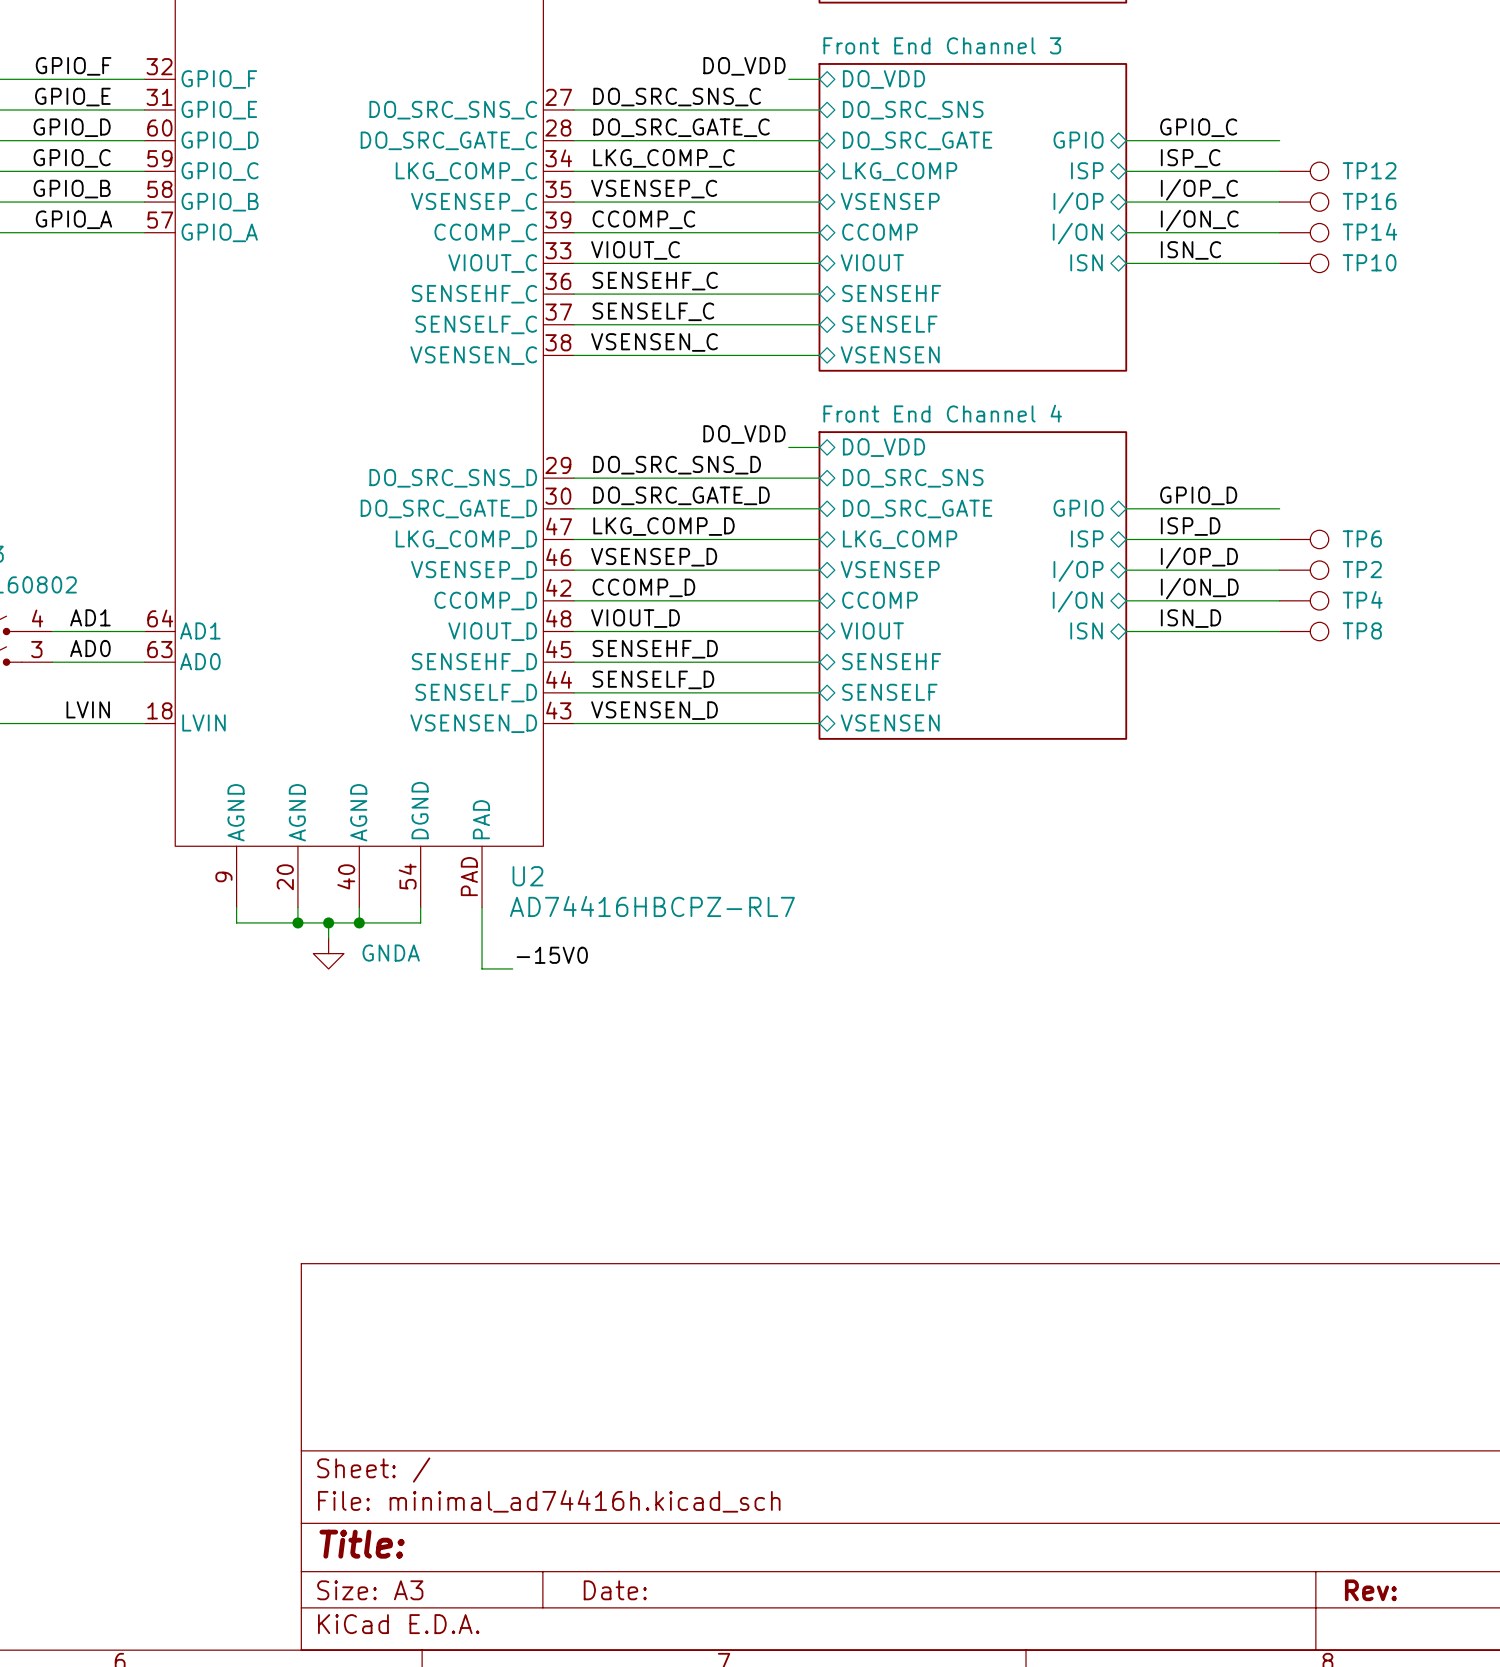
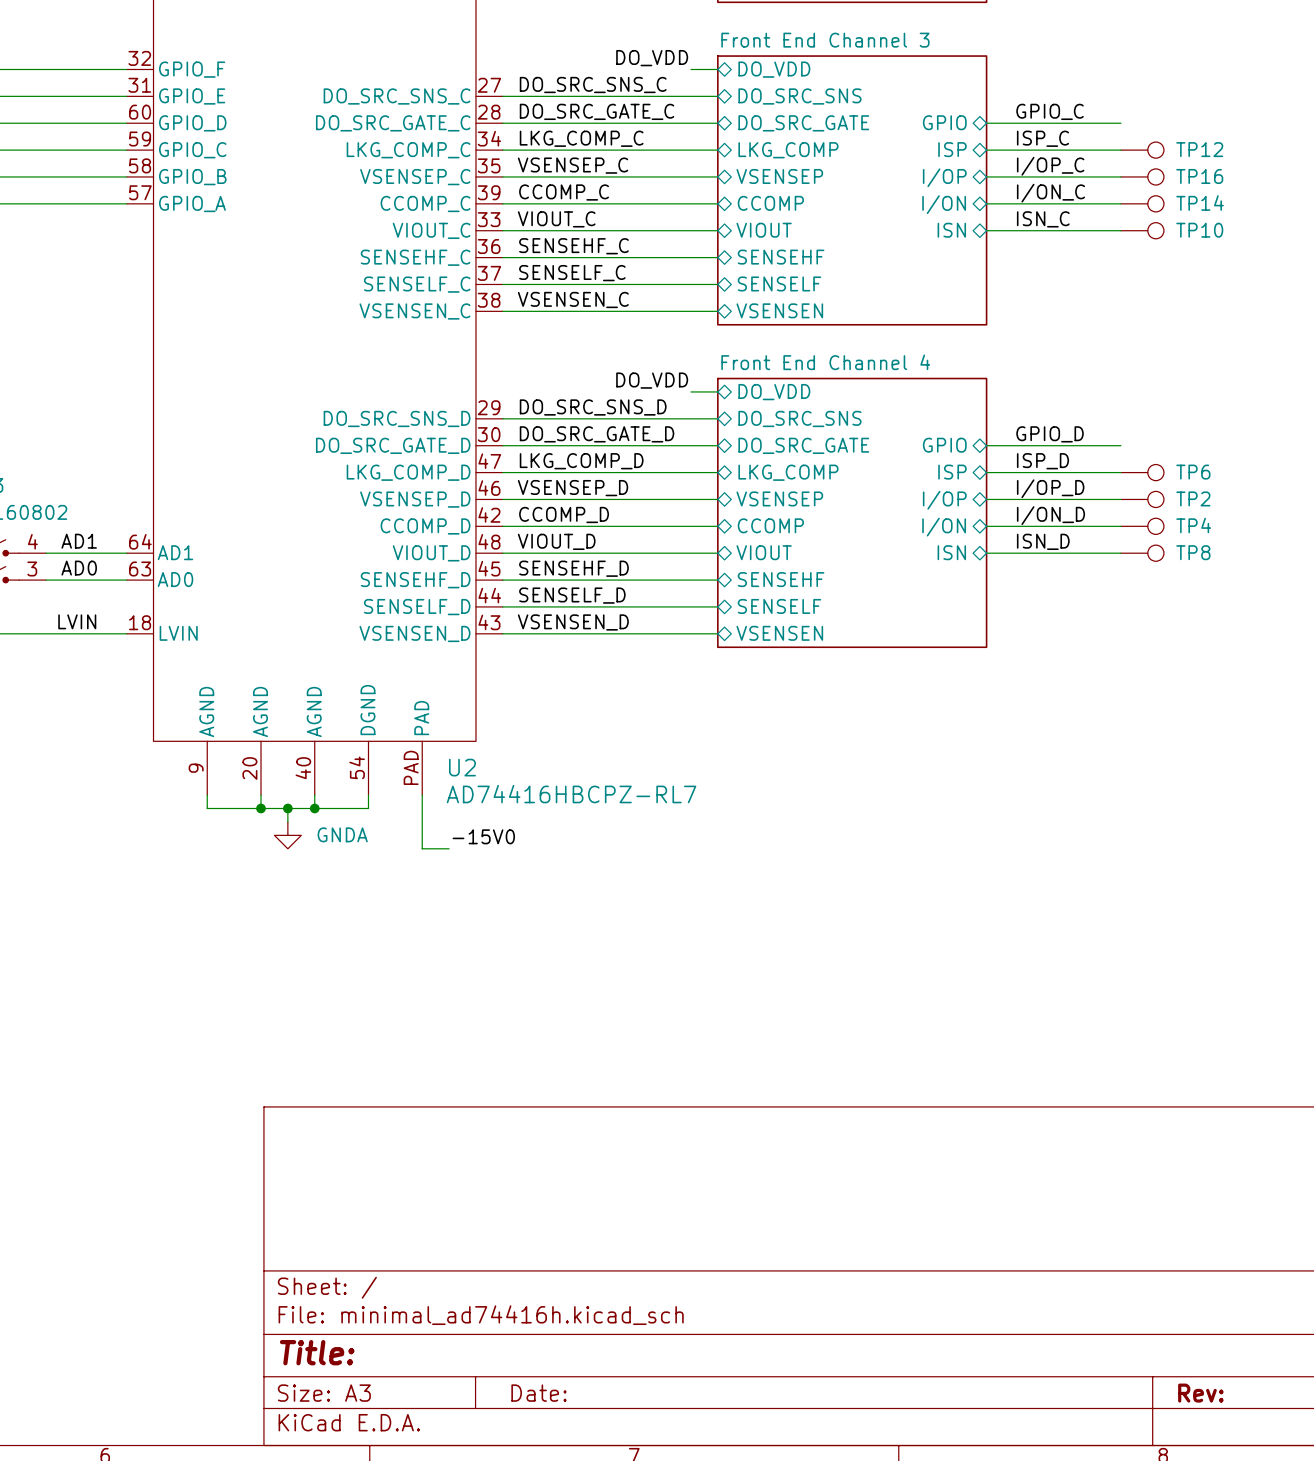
label: GPIO_F (73, 66) -> none
label: GPIO_E (72, 97) -> none
label: GPIO_D (72, 127) -> none
label: GPIO_C (72, 158) -> none
label: GPIO_B (72, 189) -> none
label: GPIO_A (73, 219) -> none

